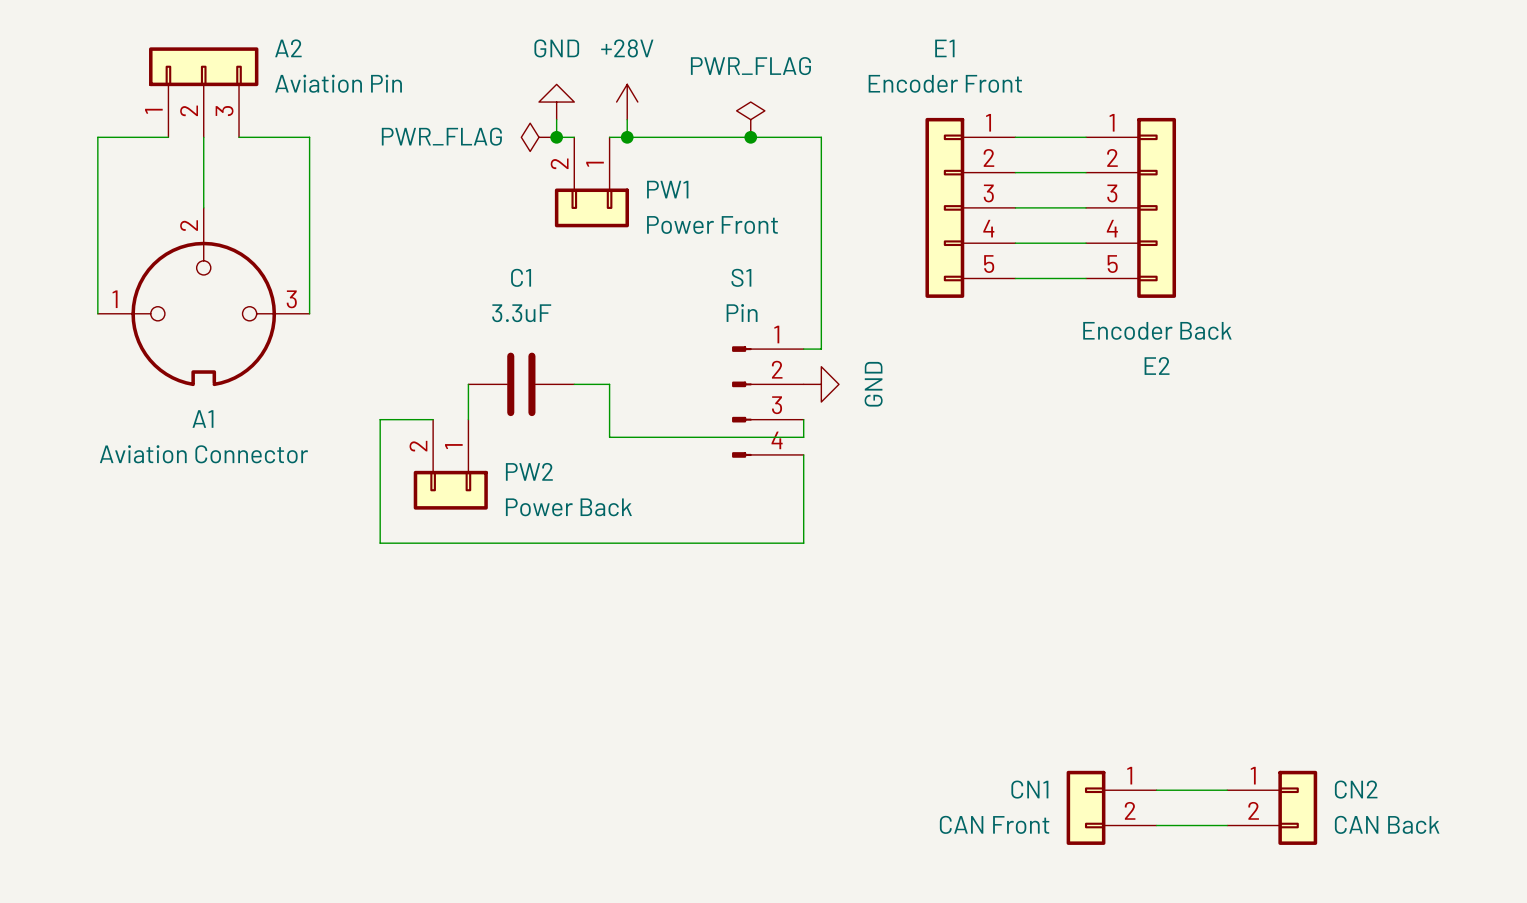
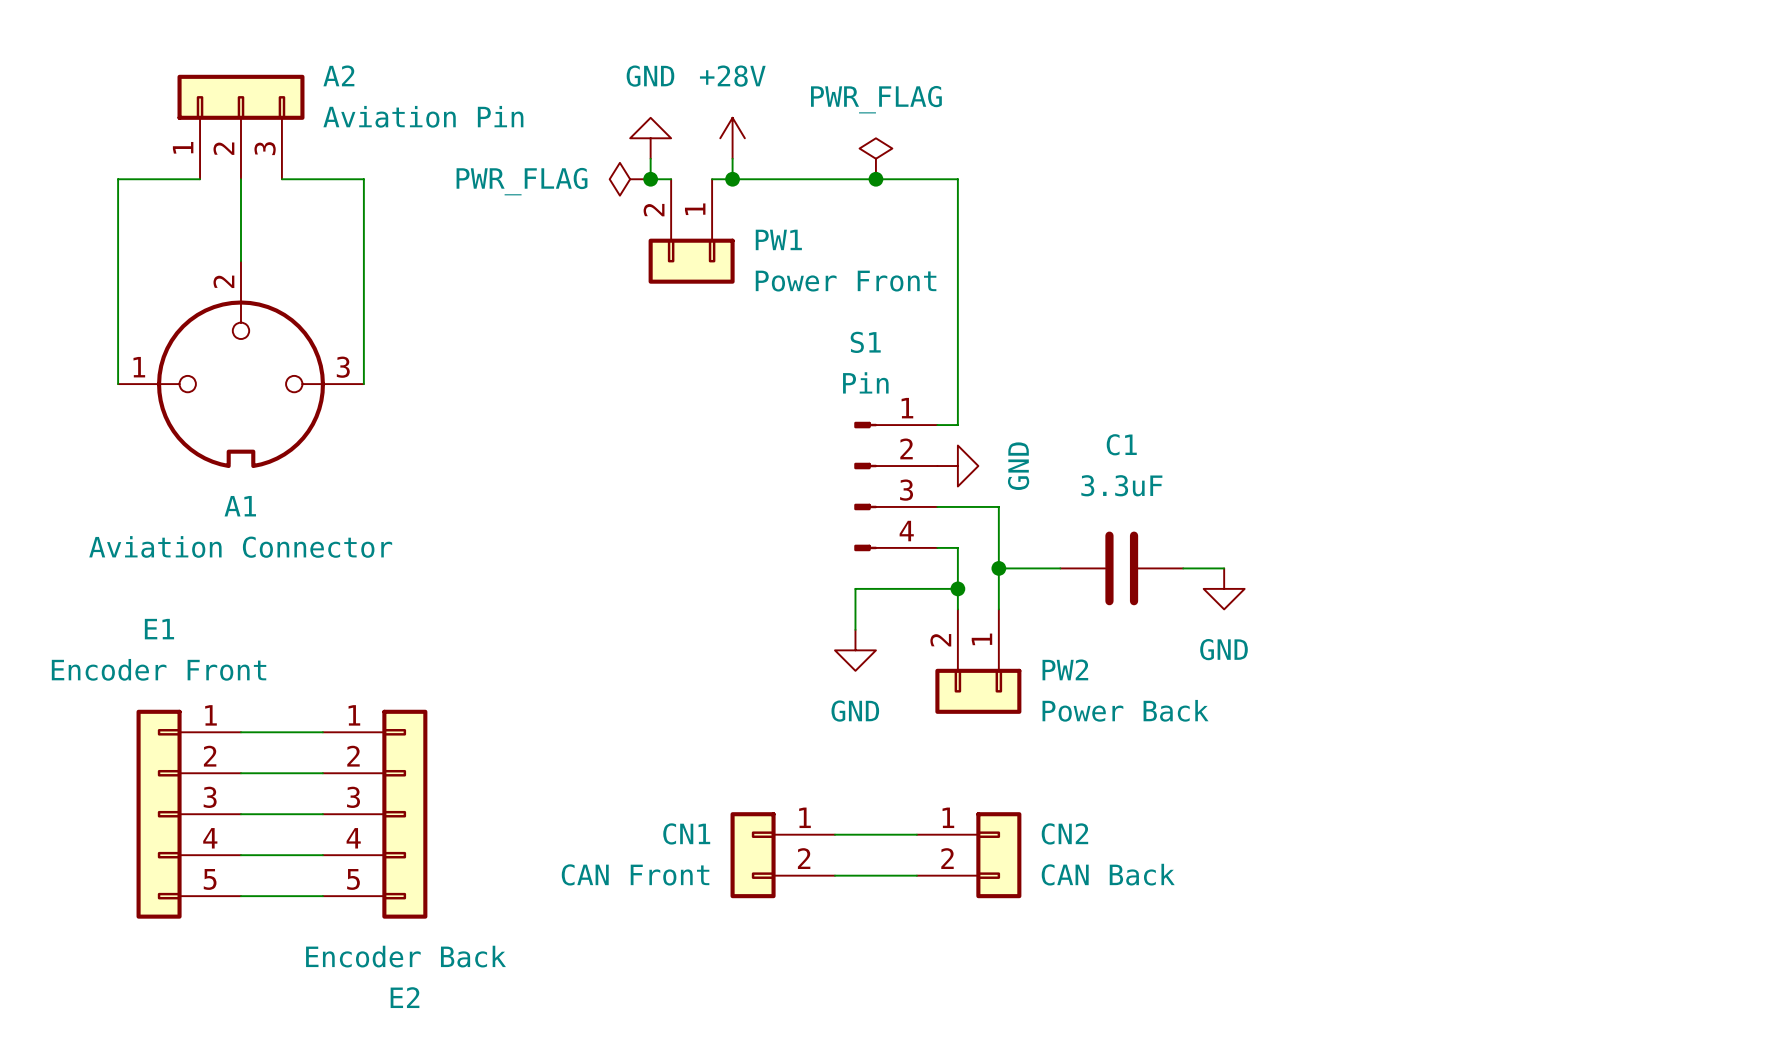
wire: (1015, 137) (1086, 137) -> none
wire: (1015, 172) (1086, 172) -> none
E1 position: (970, 207) -> (188, 814)
wire: (1015, 207) (1086, 207) -> none
E2 position: (1131, 207) -> (375, 814)
wire: (1015, 243) (1086, 243) -> none
wire: (1015, 278) (1086, 278) -> none
wire: (468, 384) (468, 419) -> none
C1 position: (521, 384) -> (1121, 568)
wire: (574, 384) (609, 384) (609, 437) (803, 437) (803, 419) -> (998, 609) (998, 506) (937, 506)
wire: (433, 419) (380, 419) (380, 543) (803, 543) (803, 454) -> (957, 609) (957, 547) (937, 547)
PW2 position: (450, 464) -> (978, 661)
wire: none -> (998, 568) (1060, 568)
junction: none -> (998, 568)
wire: none -> (1183, 568) (1224, 568)
wire: none -> (957, 588) (855, 588) (855, 629)
junction: none -> (957, 588)
power symbol: none -> GND (1224, 588)
power symbol: none -> GND (855, 650)
wire: none -> (240, 732) (322, 732)
wire: none -> (240, 773) (322, 773)
wire: none -> (240, 814) (322, 814)
wire: none -> (834, 834) (916, 834)
wire: none -> (240, 855) (322, 855)
wire: none -> (834, 875) (916, 875)
wire: none -> (240, 896) (322, 896)
wire: (1156, 790) (1227, 790) -> none
CN1 position: (1111, 807) -> (782, 855)
CN2 position: (1272, 807) -> (969, 855)
wire: (1156, 825) (1227, 825) -> none

